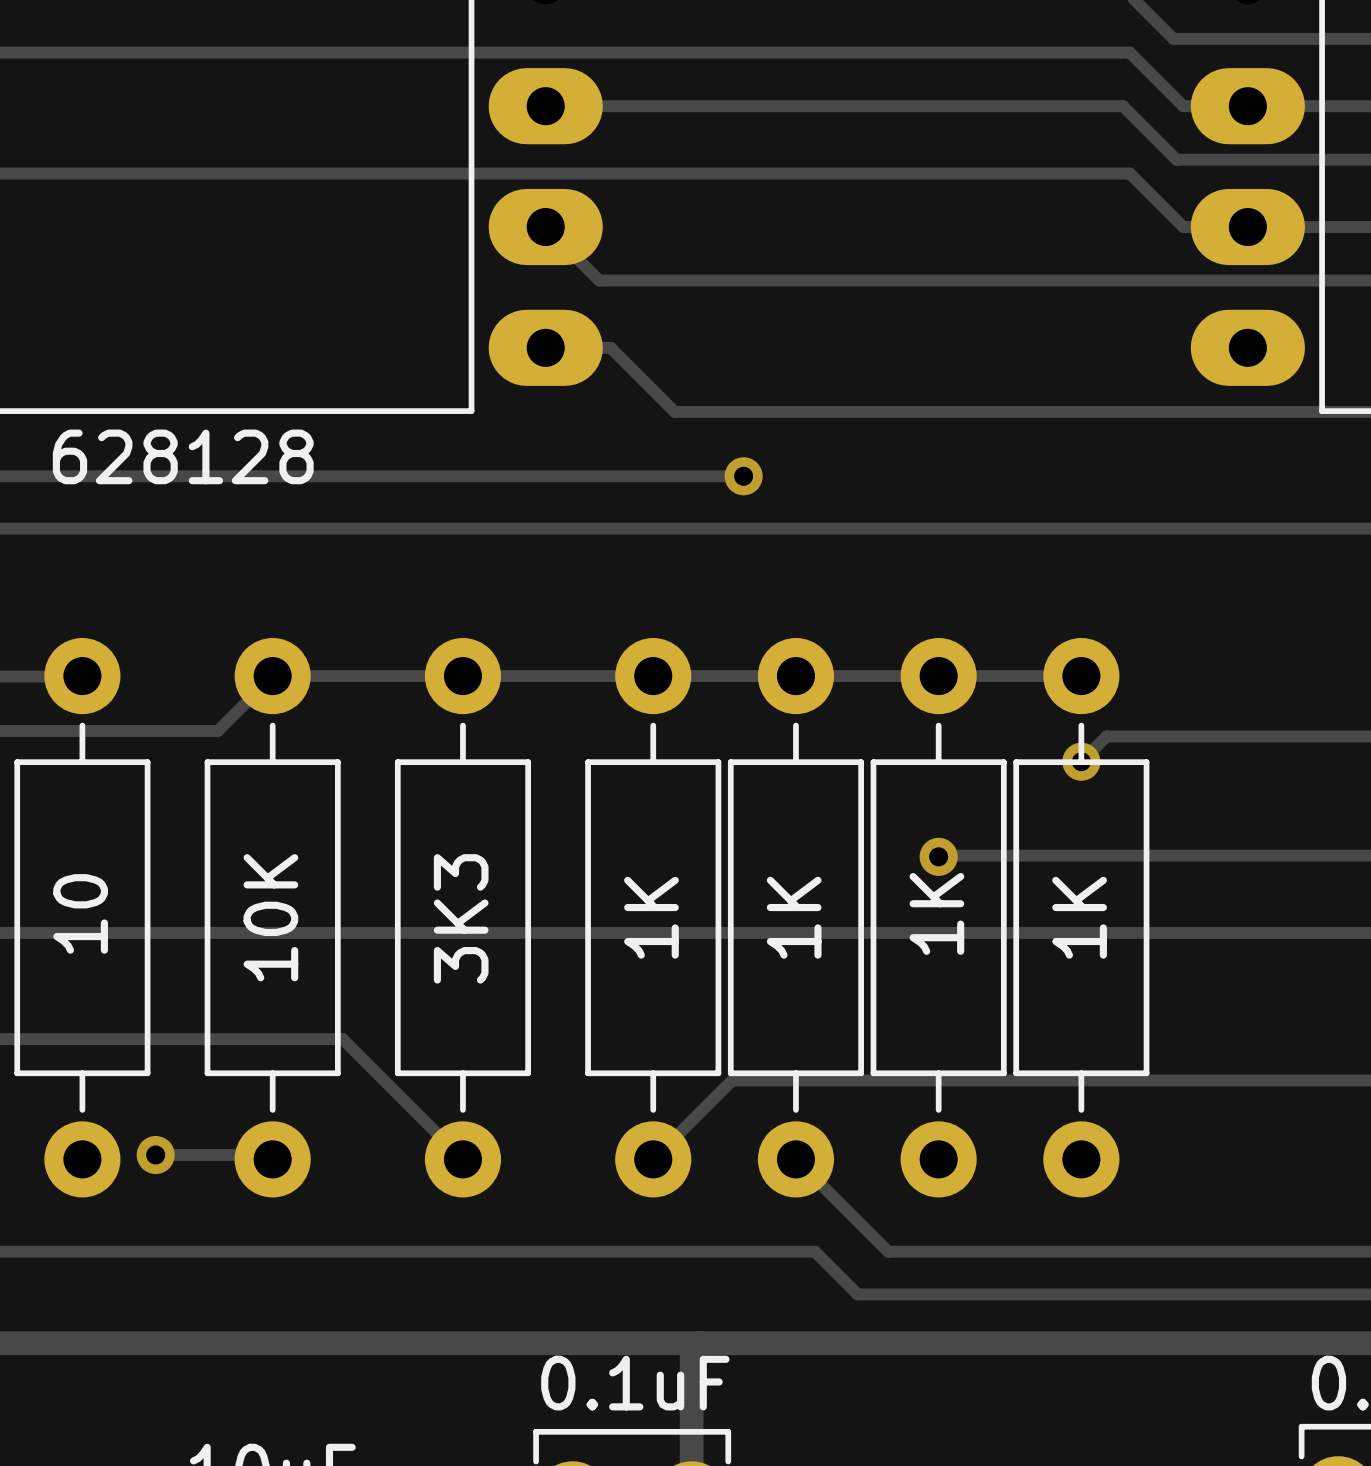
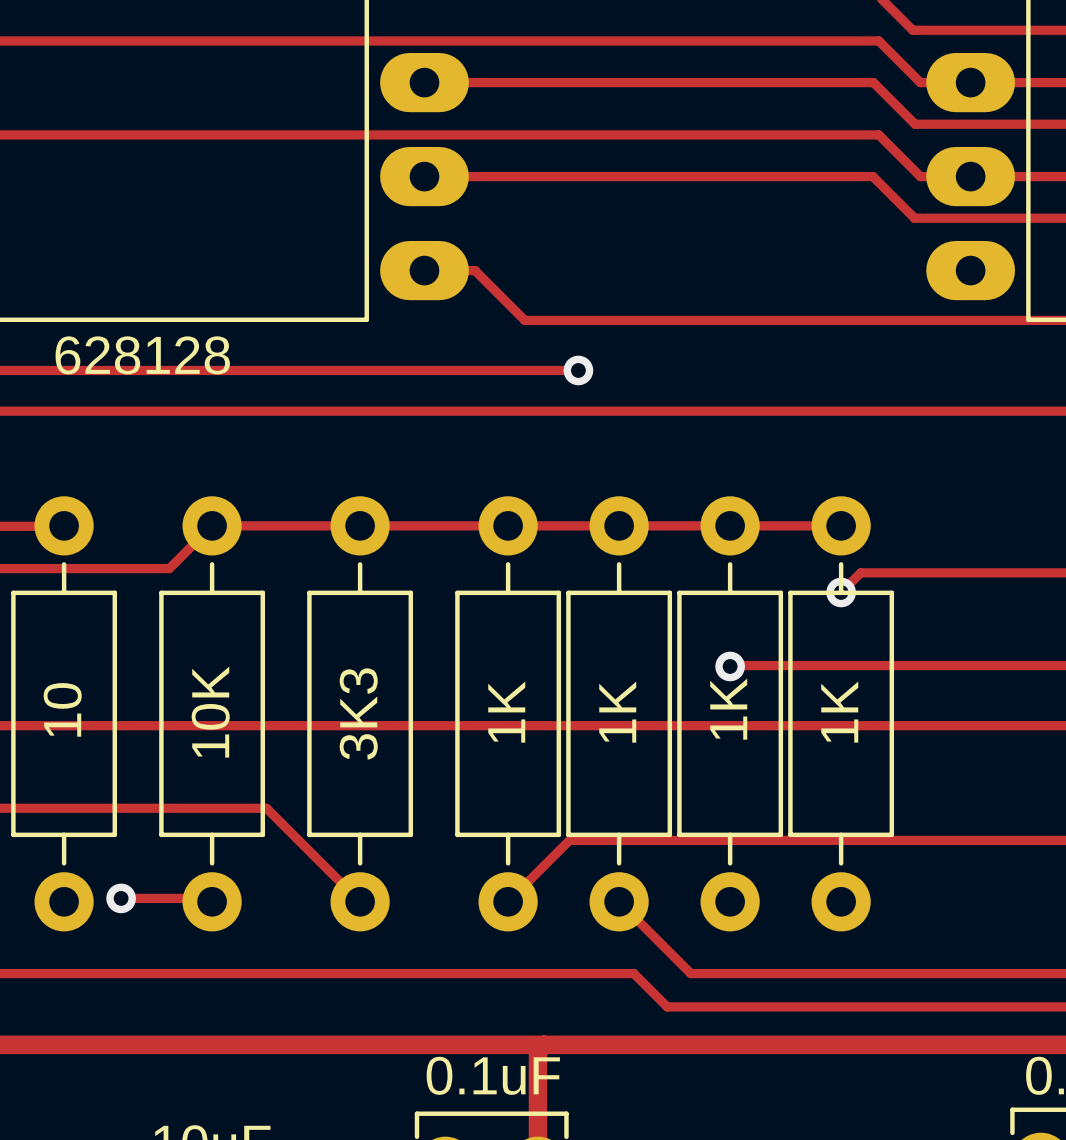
track: (545, 227) (599, 280) (1175, 280) -> (424, 176) (872, 176) (914, 218)

